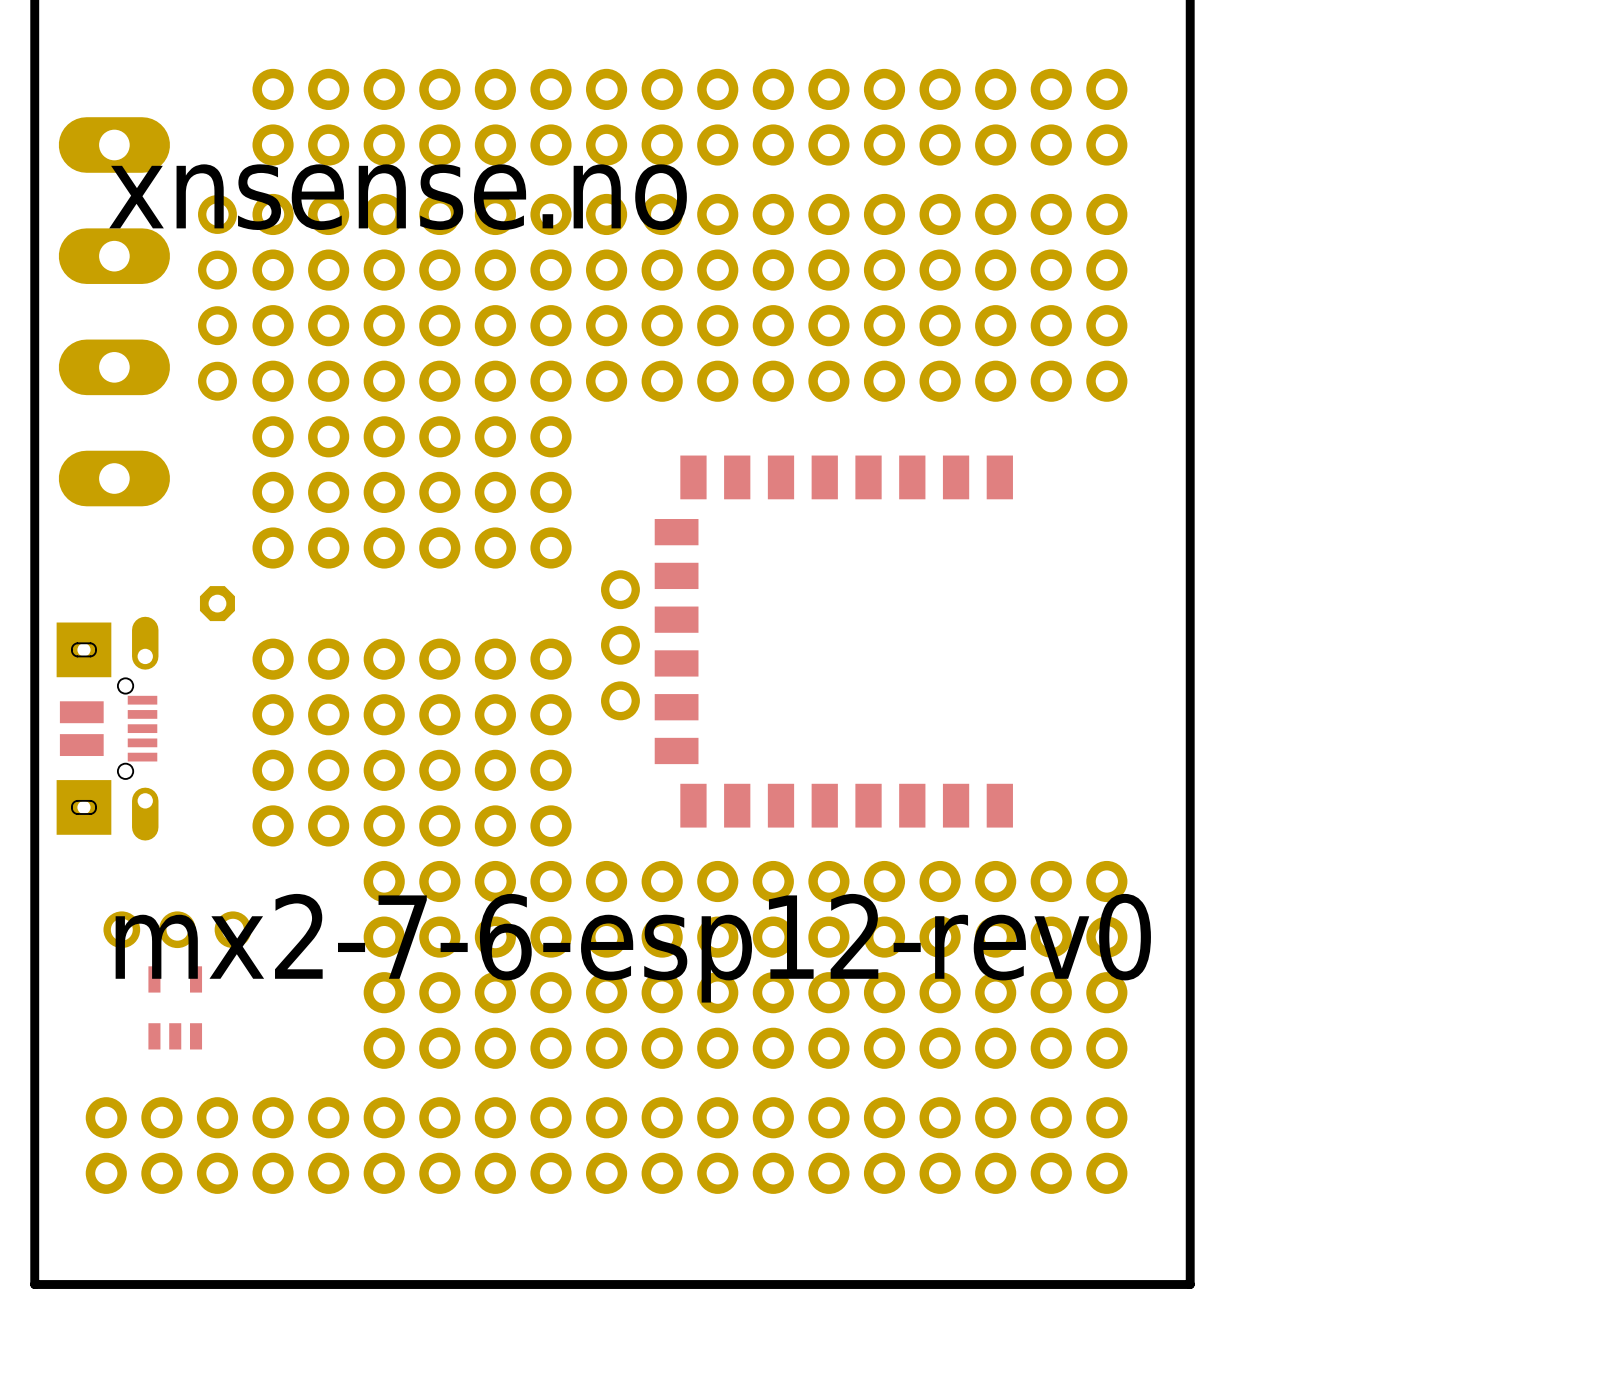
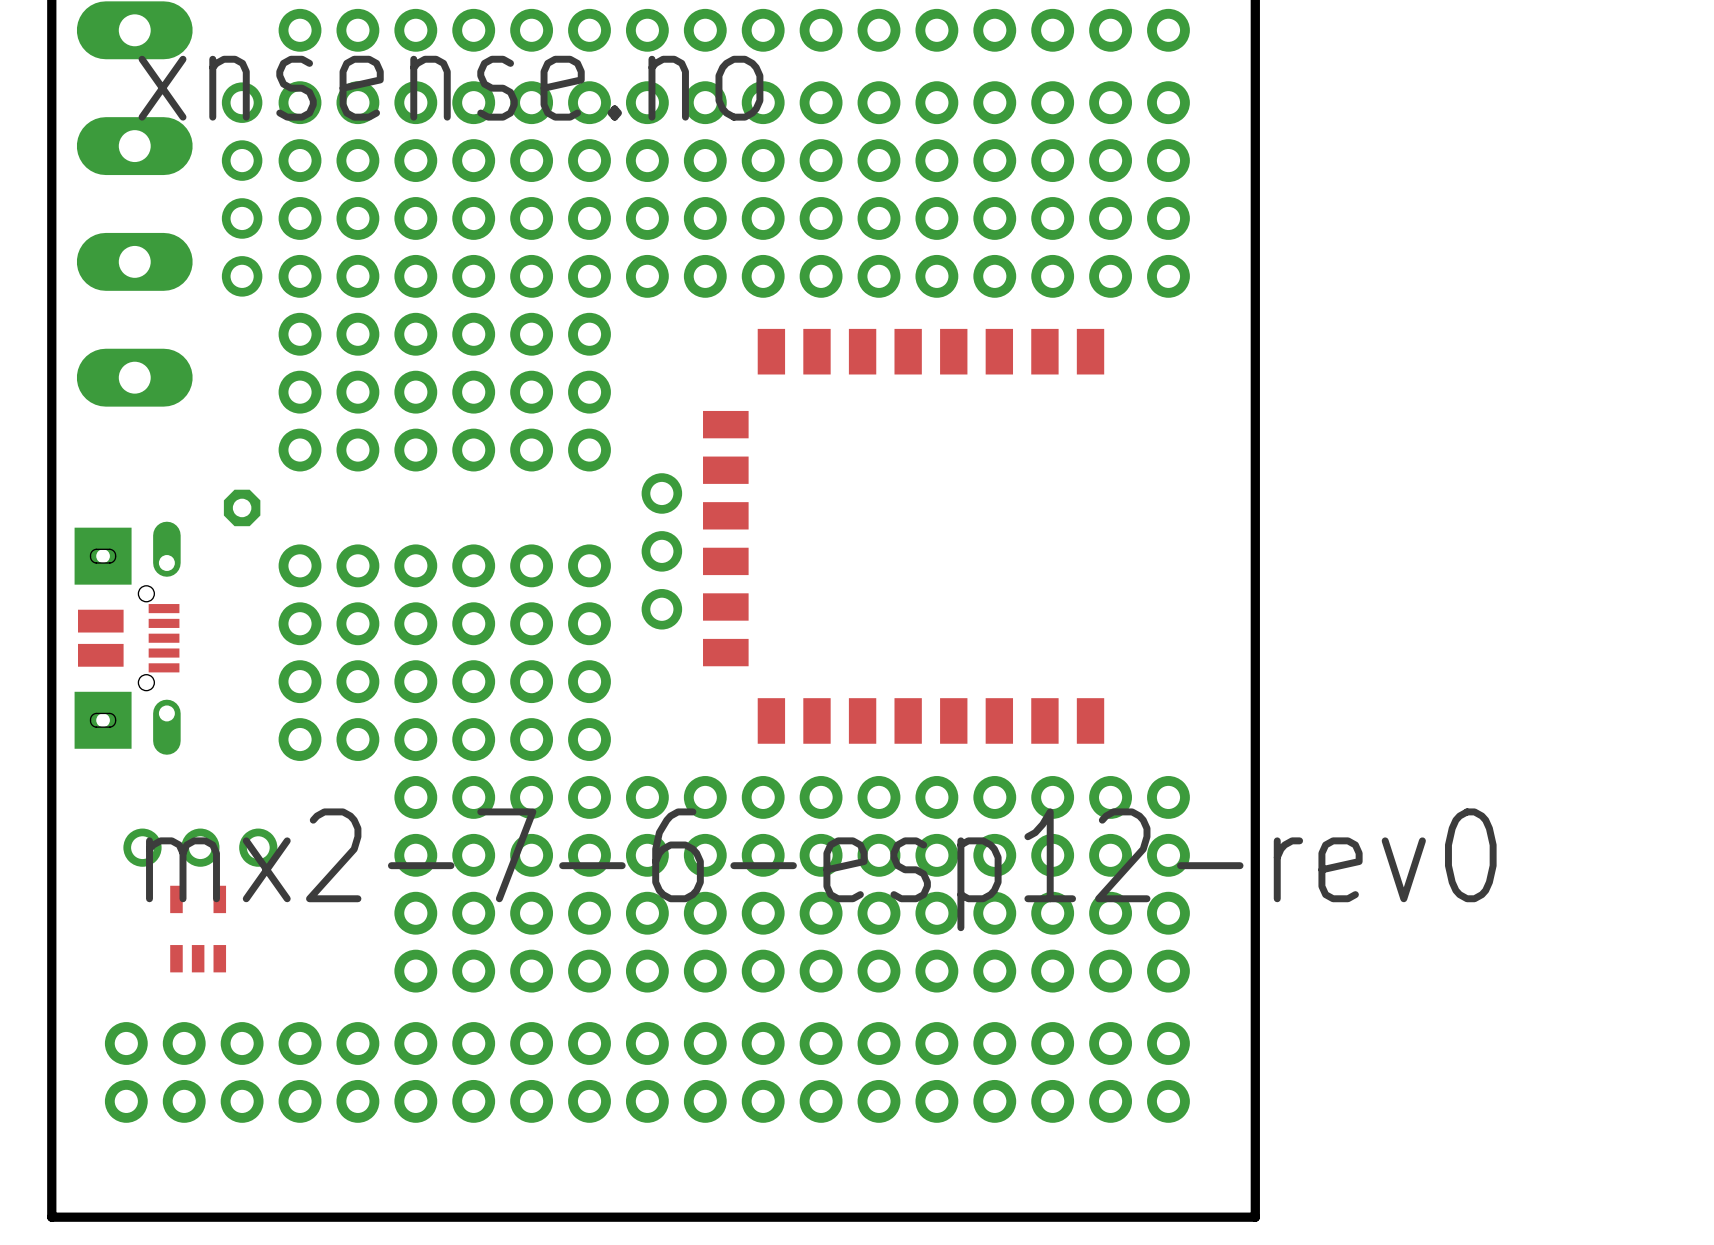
part footprint: [654, 455, 1013, 828] -> [703, 328, 1105, 744]

